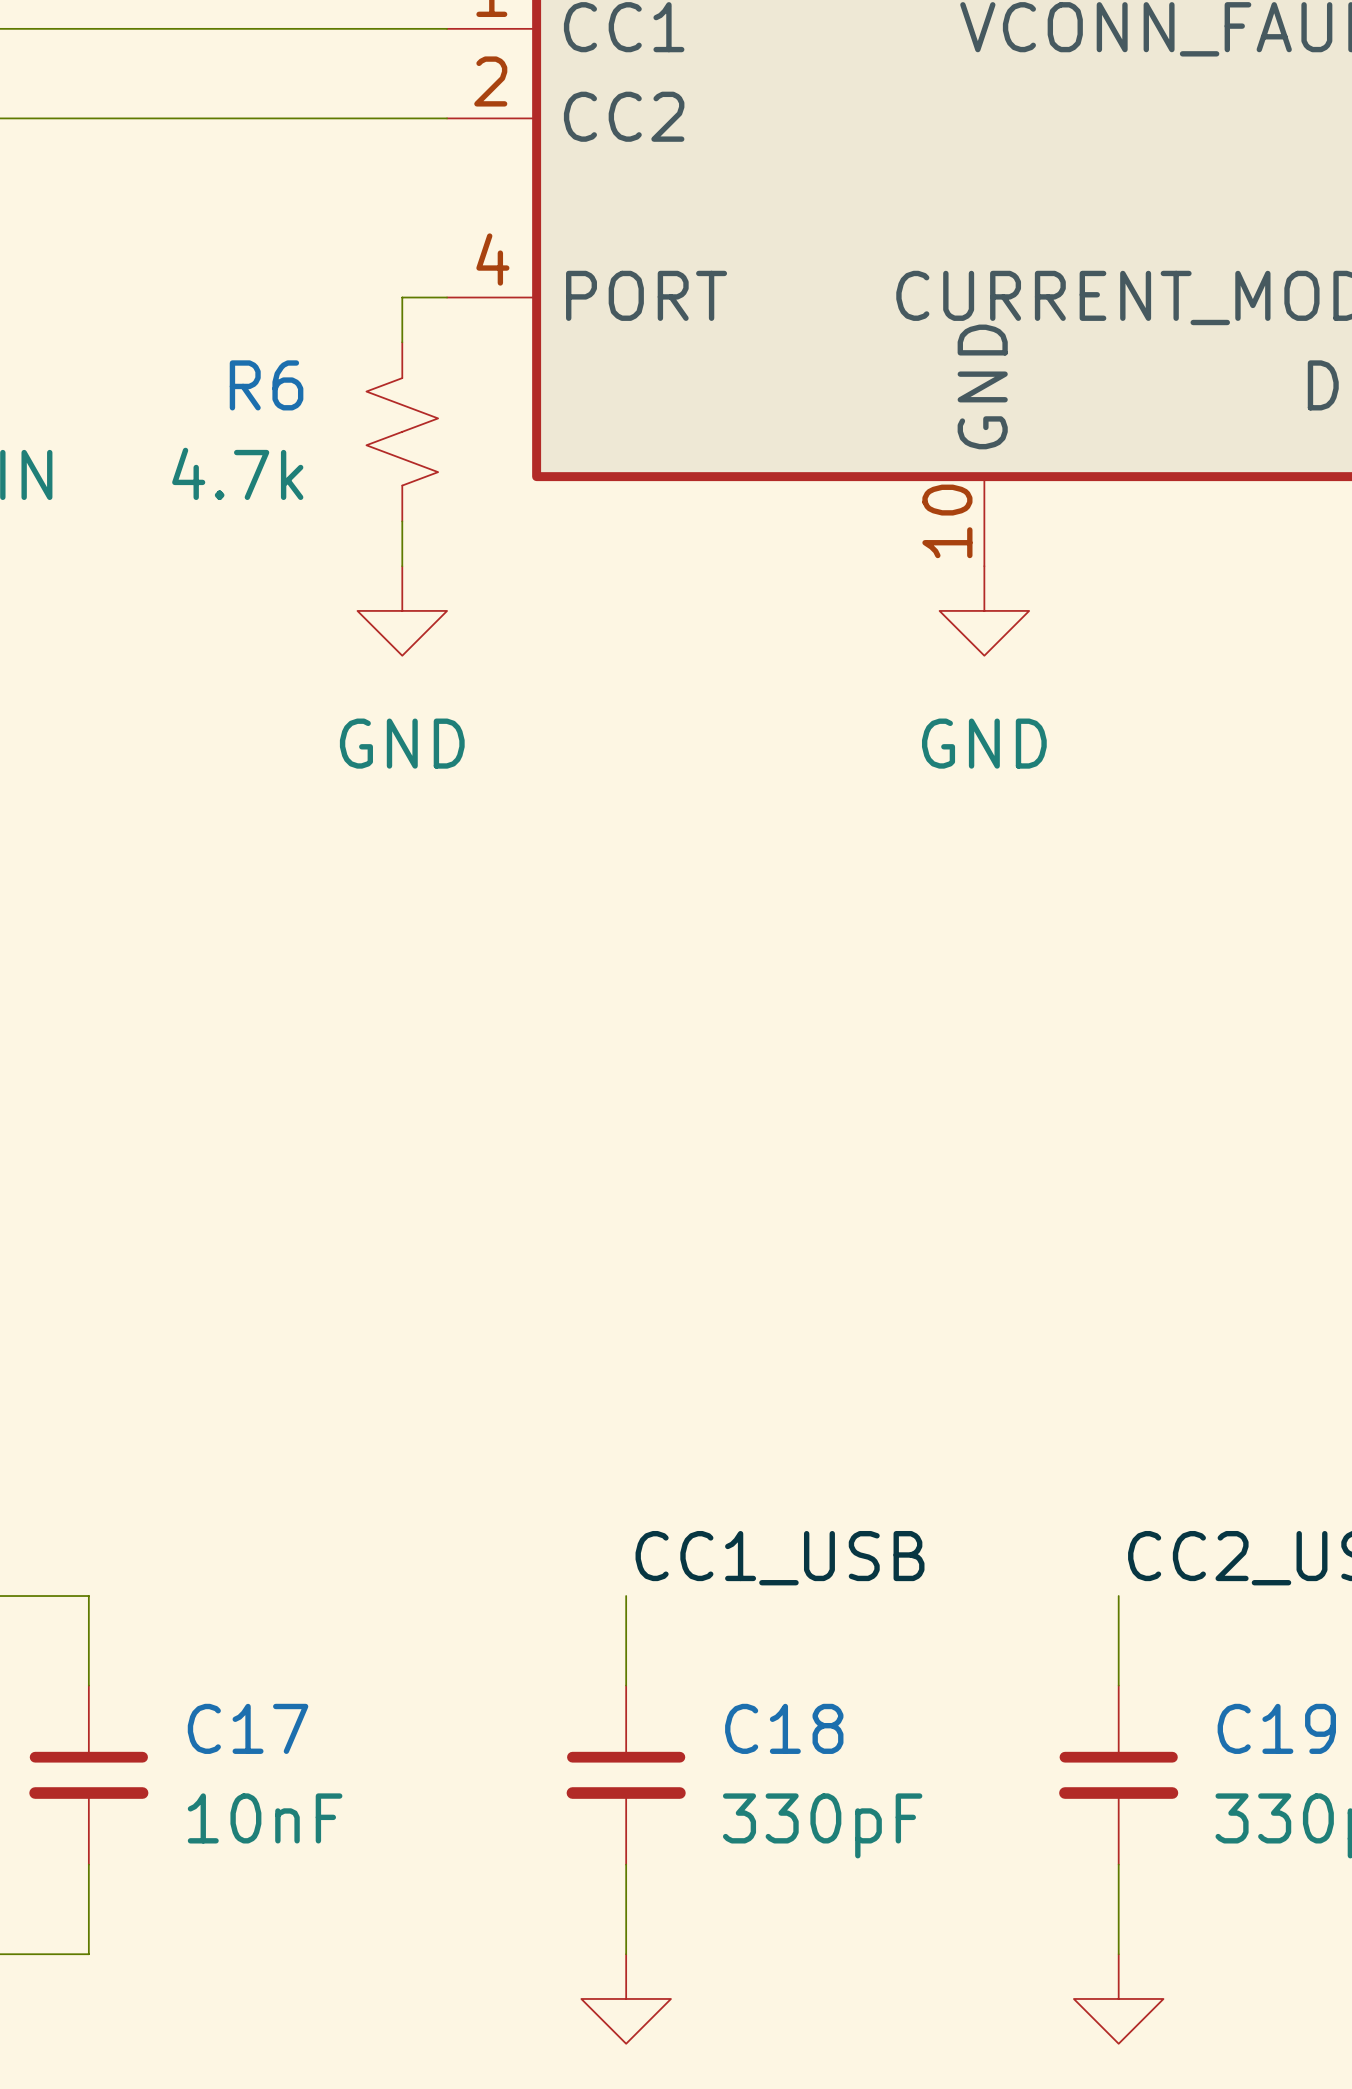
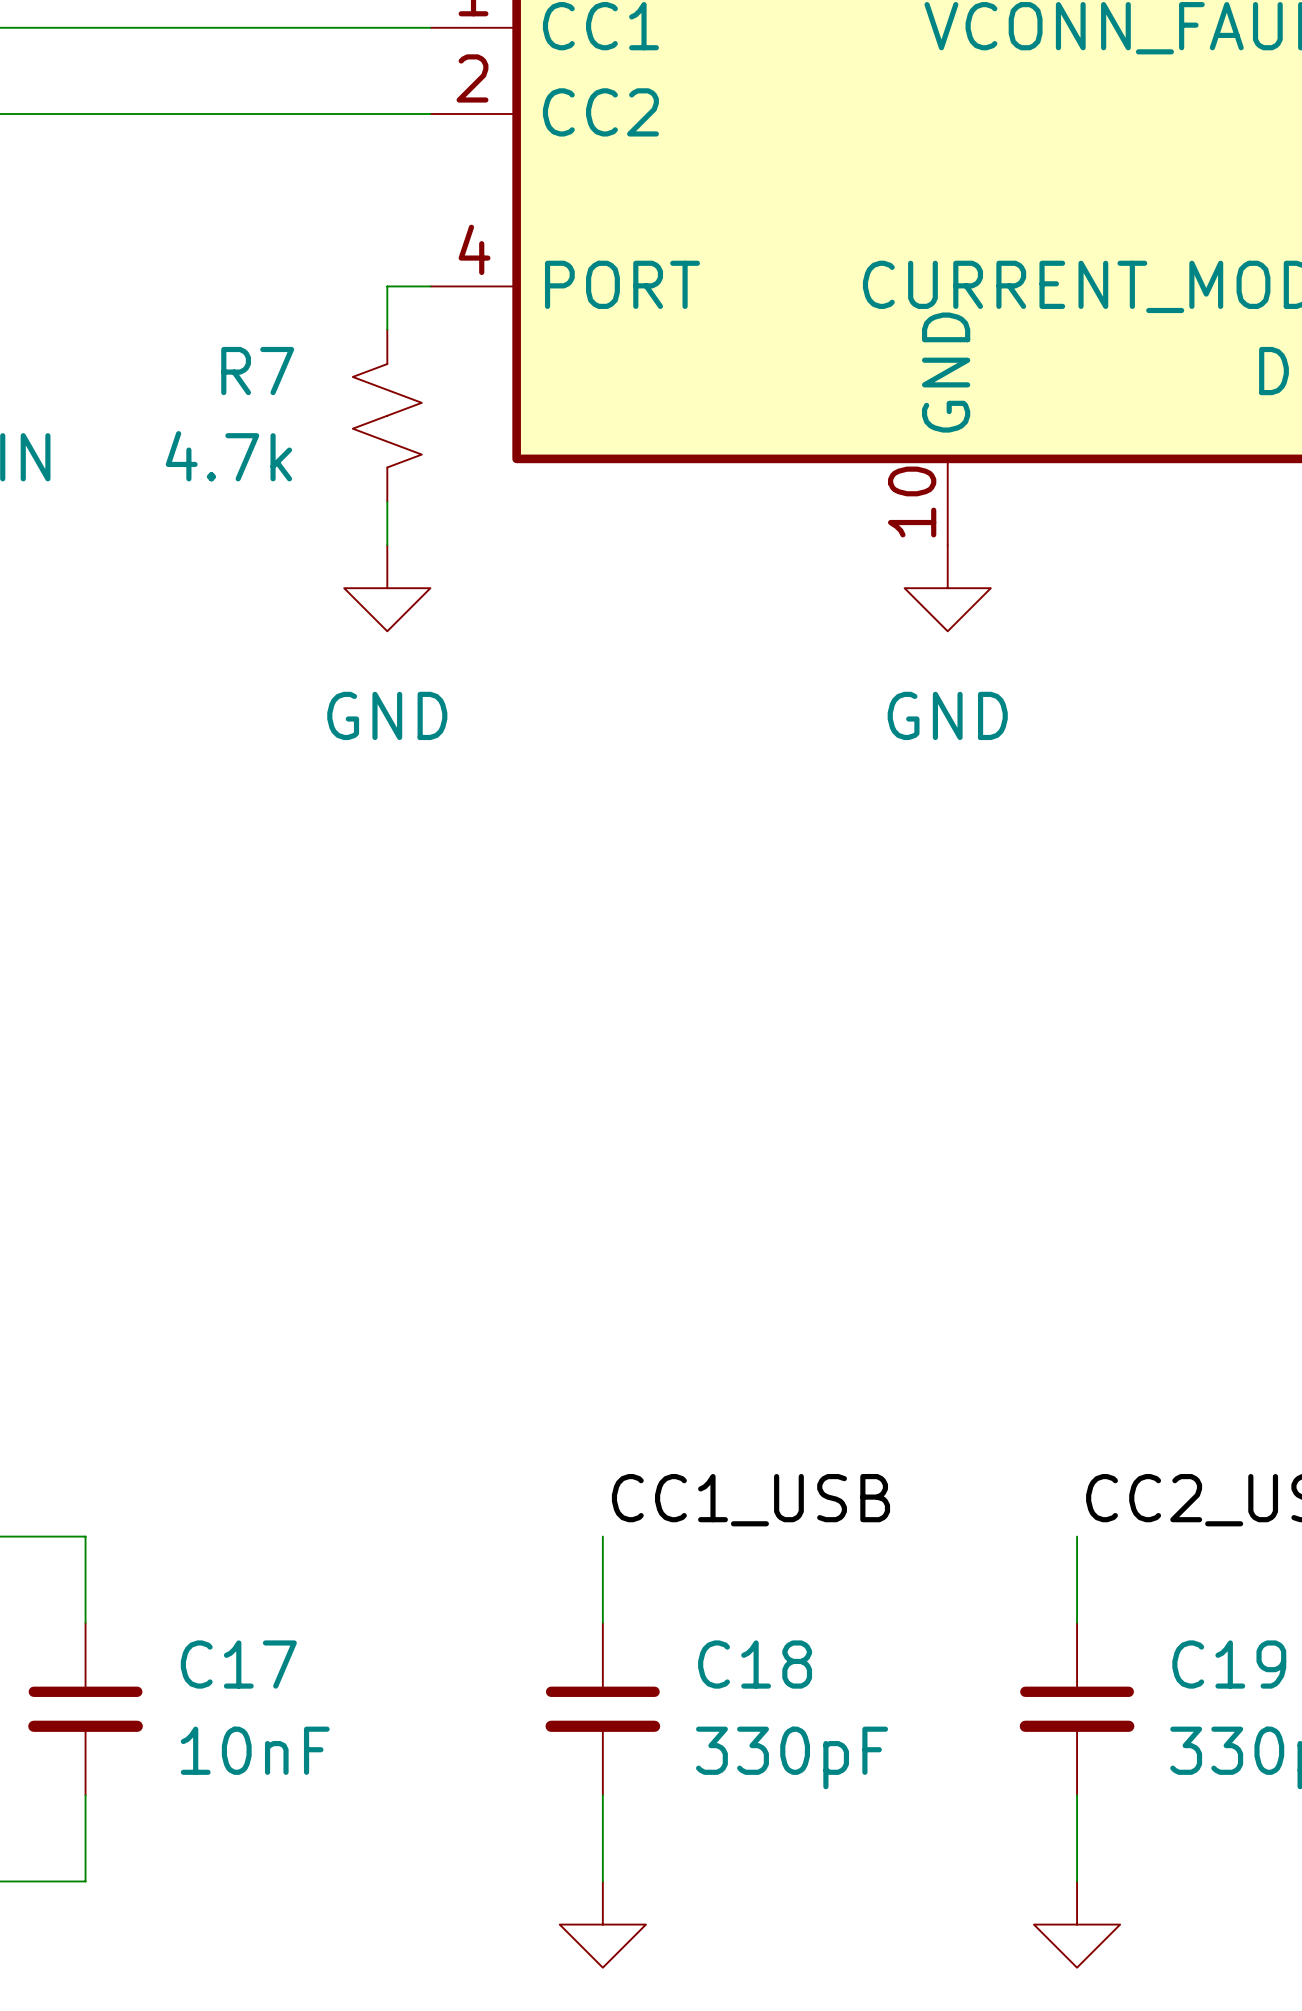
R6 name: R6 (266, 385) -> R7 (257, 371)

